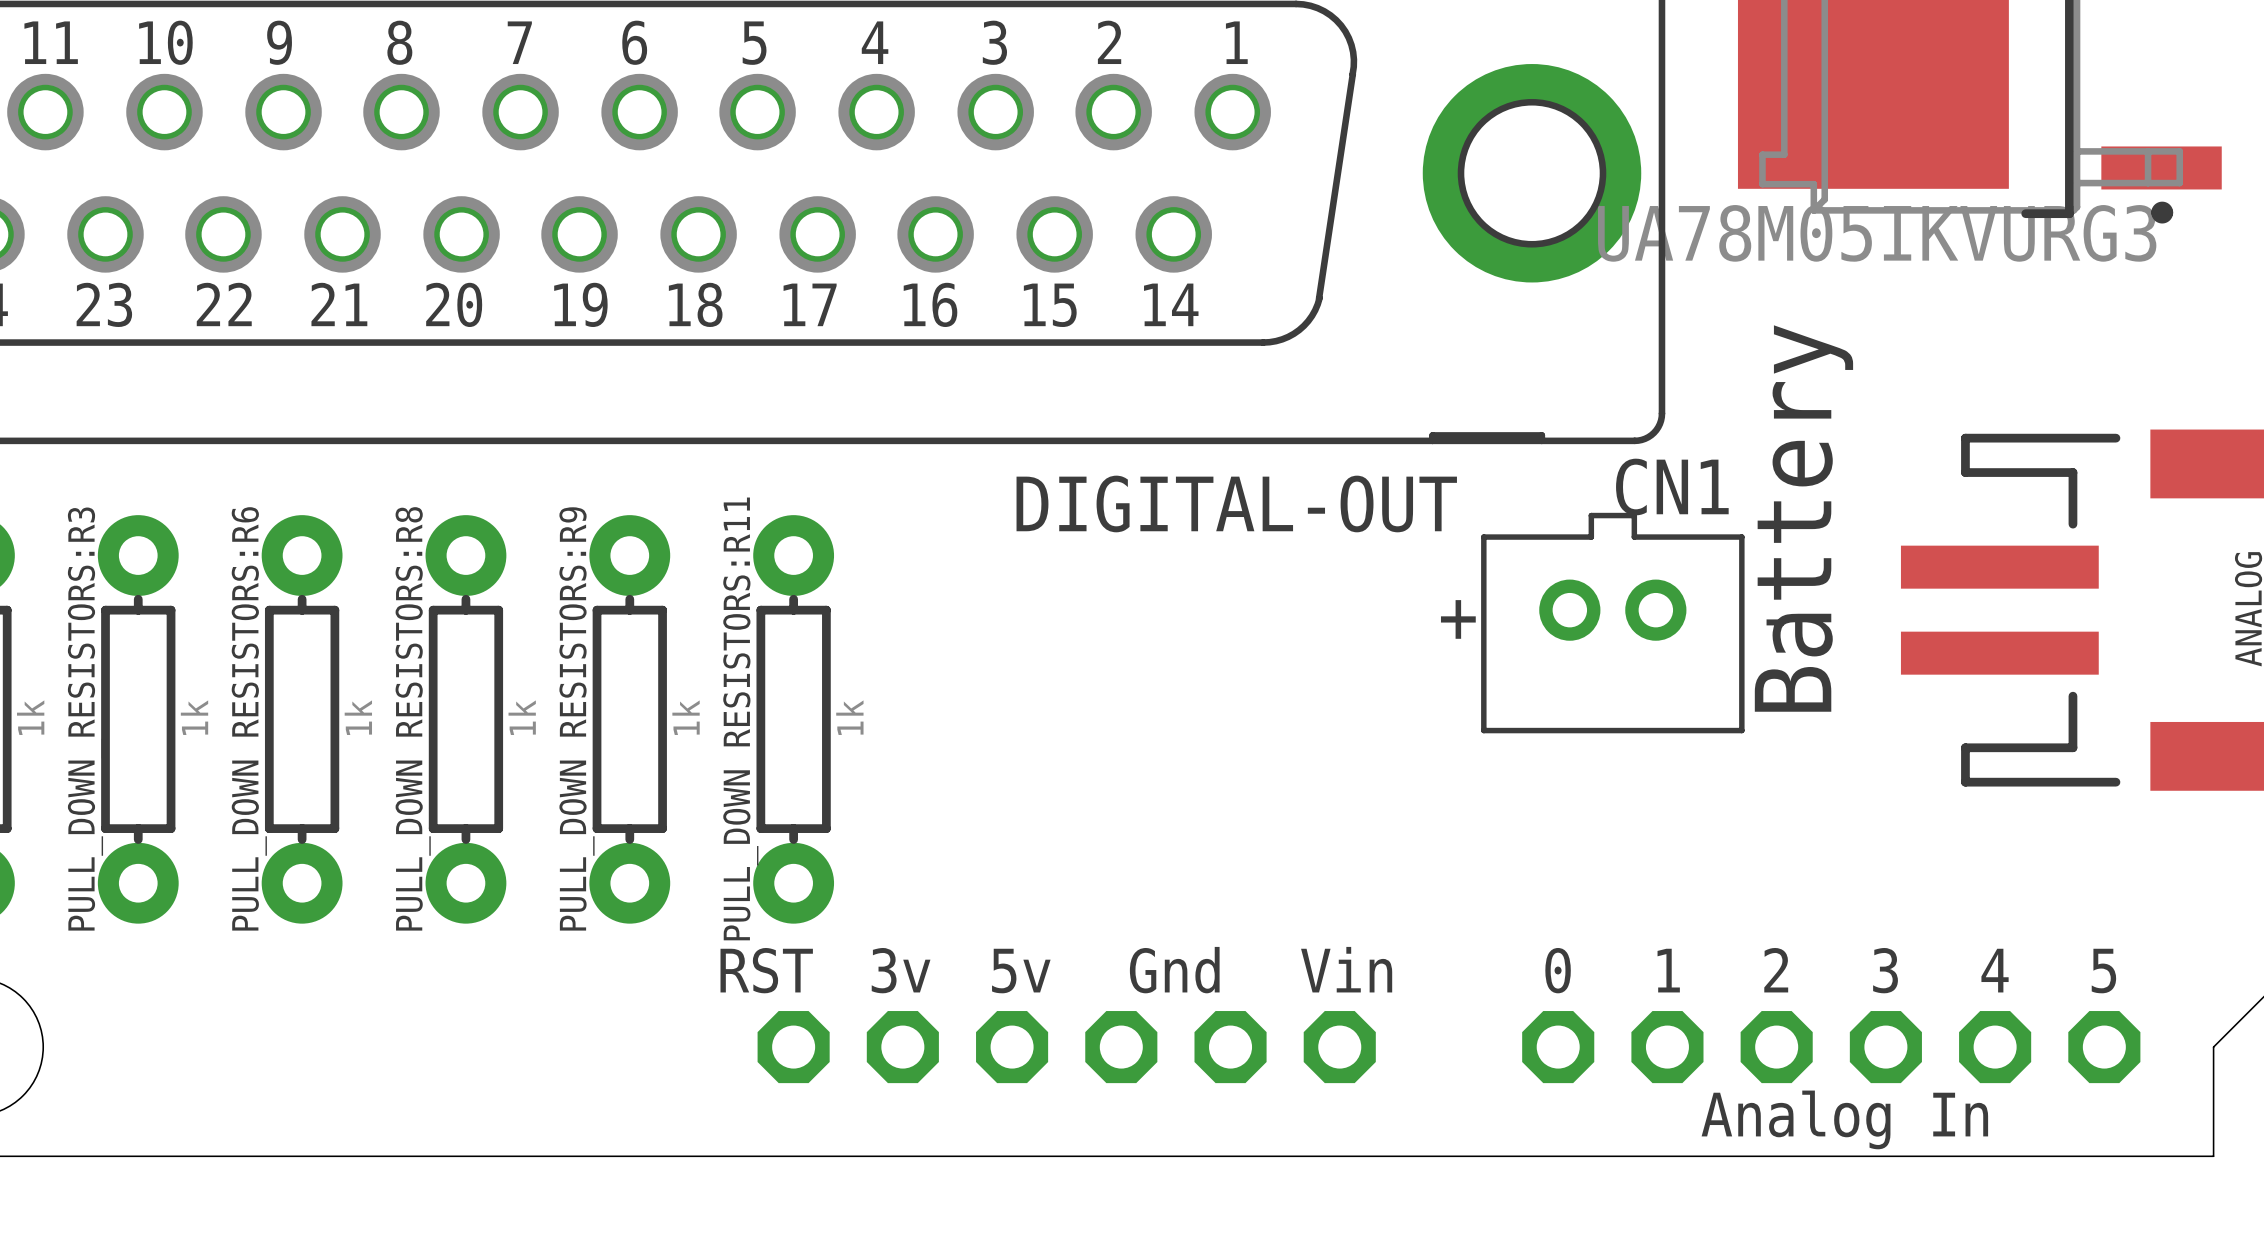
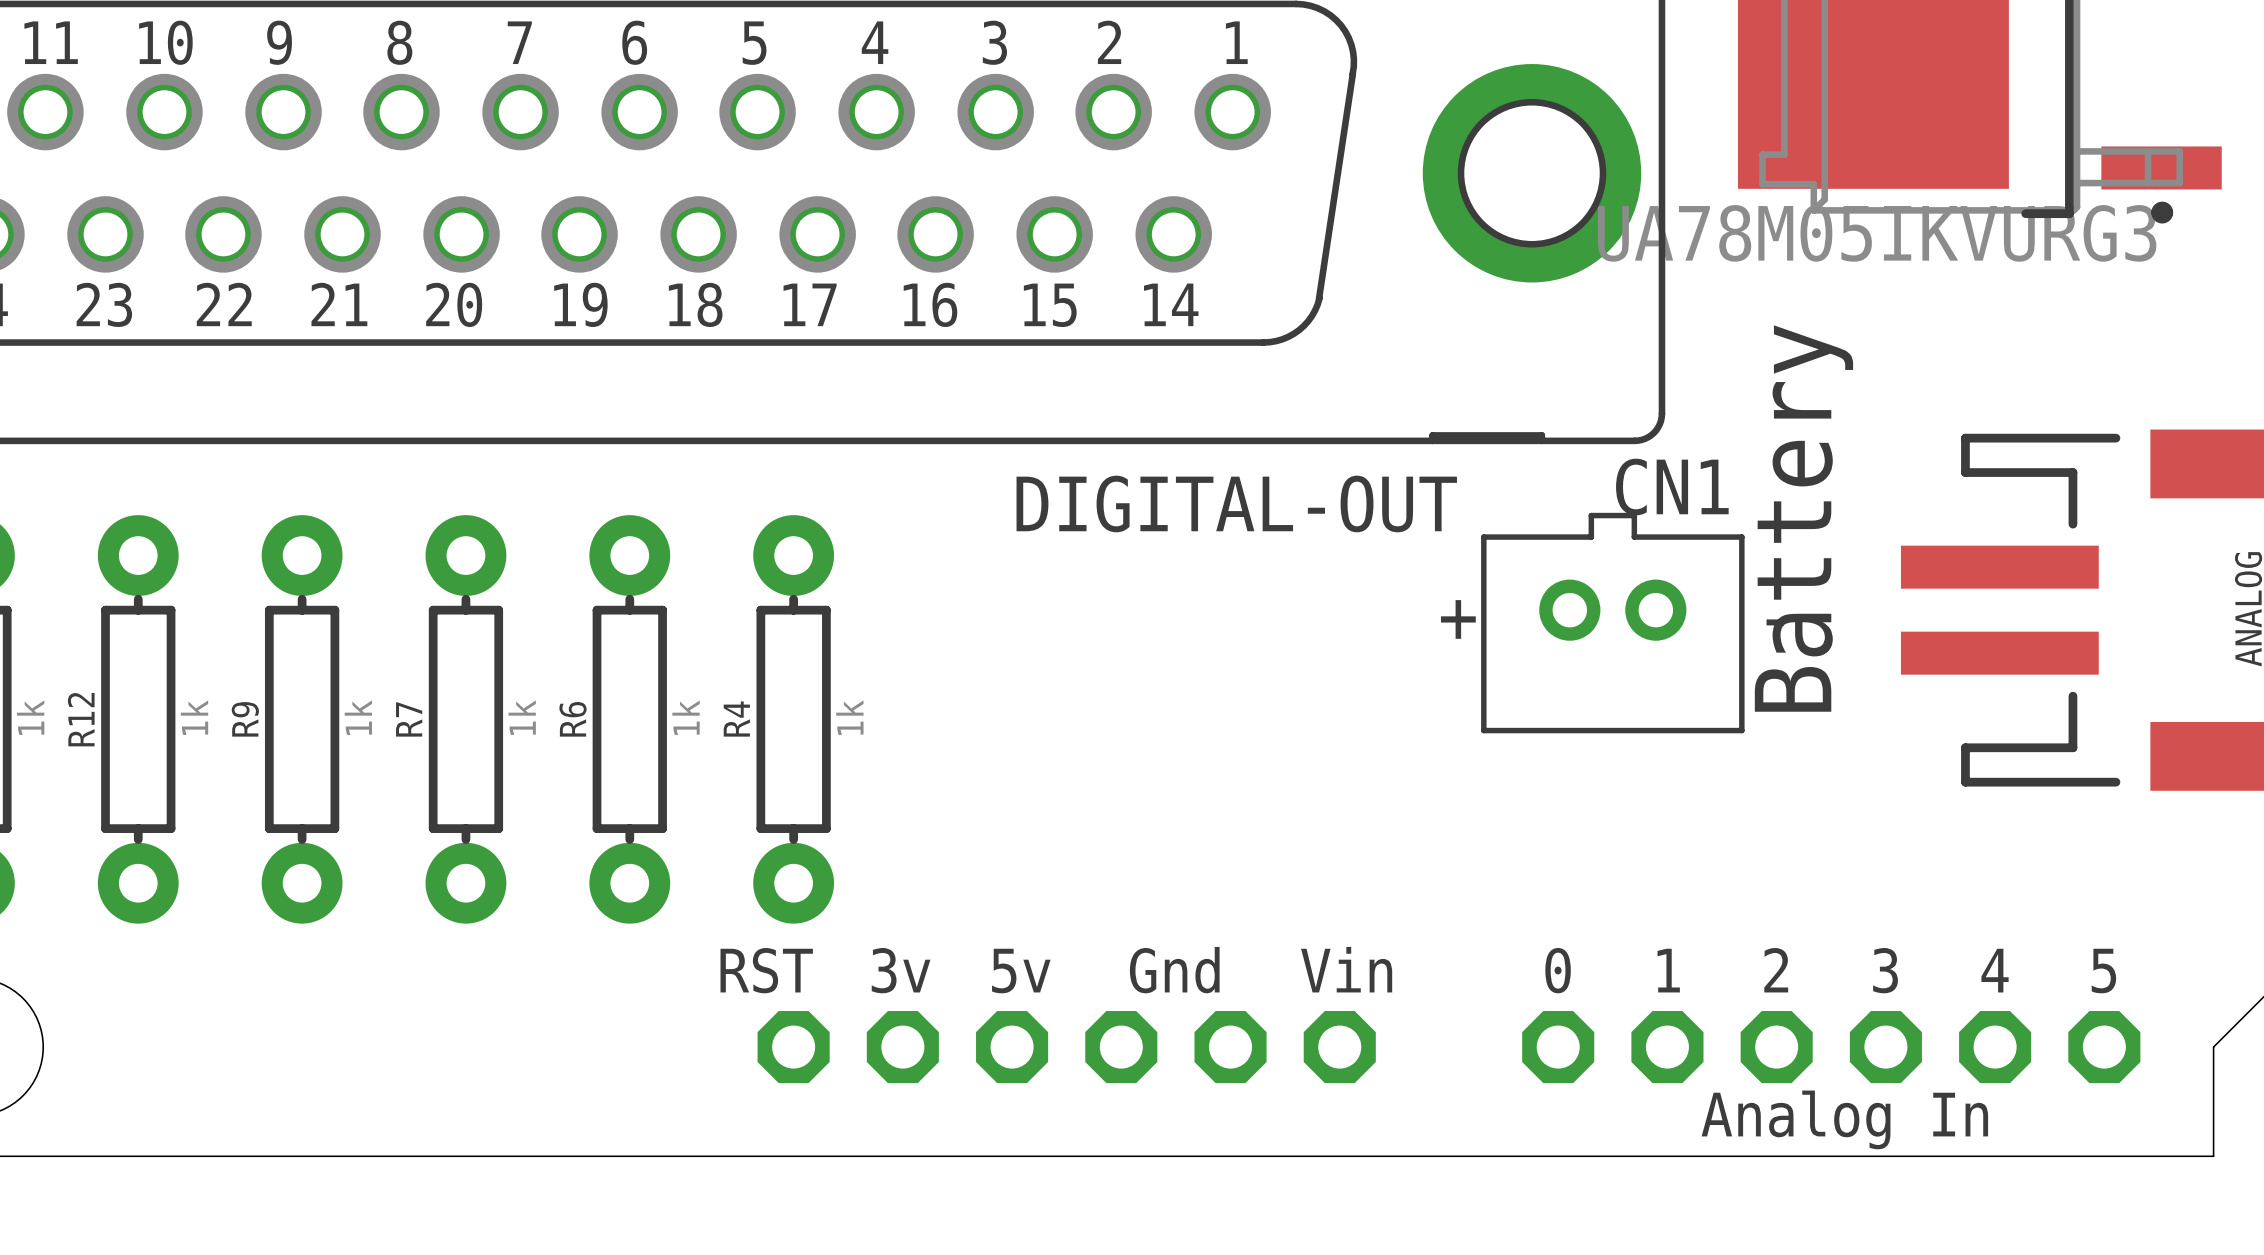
R9 name: PULL_DOWN_RESISTORS:R6 (249, 718) -> R9 (245, 719)
R7 name: PULL_DOWN_RESISTORS:R8 (413, 718) -> R7 (409, 719)
R6 name: PULL_DOWN_RESISTORS:R9 (576, 718) -> R6 (573, 719)
R4 name: PULL_DOWN_RESISTORS:R11 (740, 718) -> R4 (736, 719)
R12 name: PULL_DOWN_RESISTORS:R3 (85, 719) -> R12 (81, 719)

